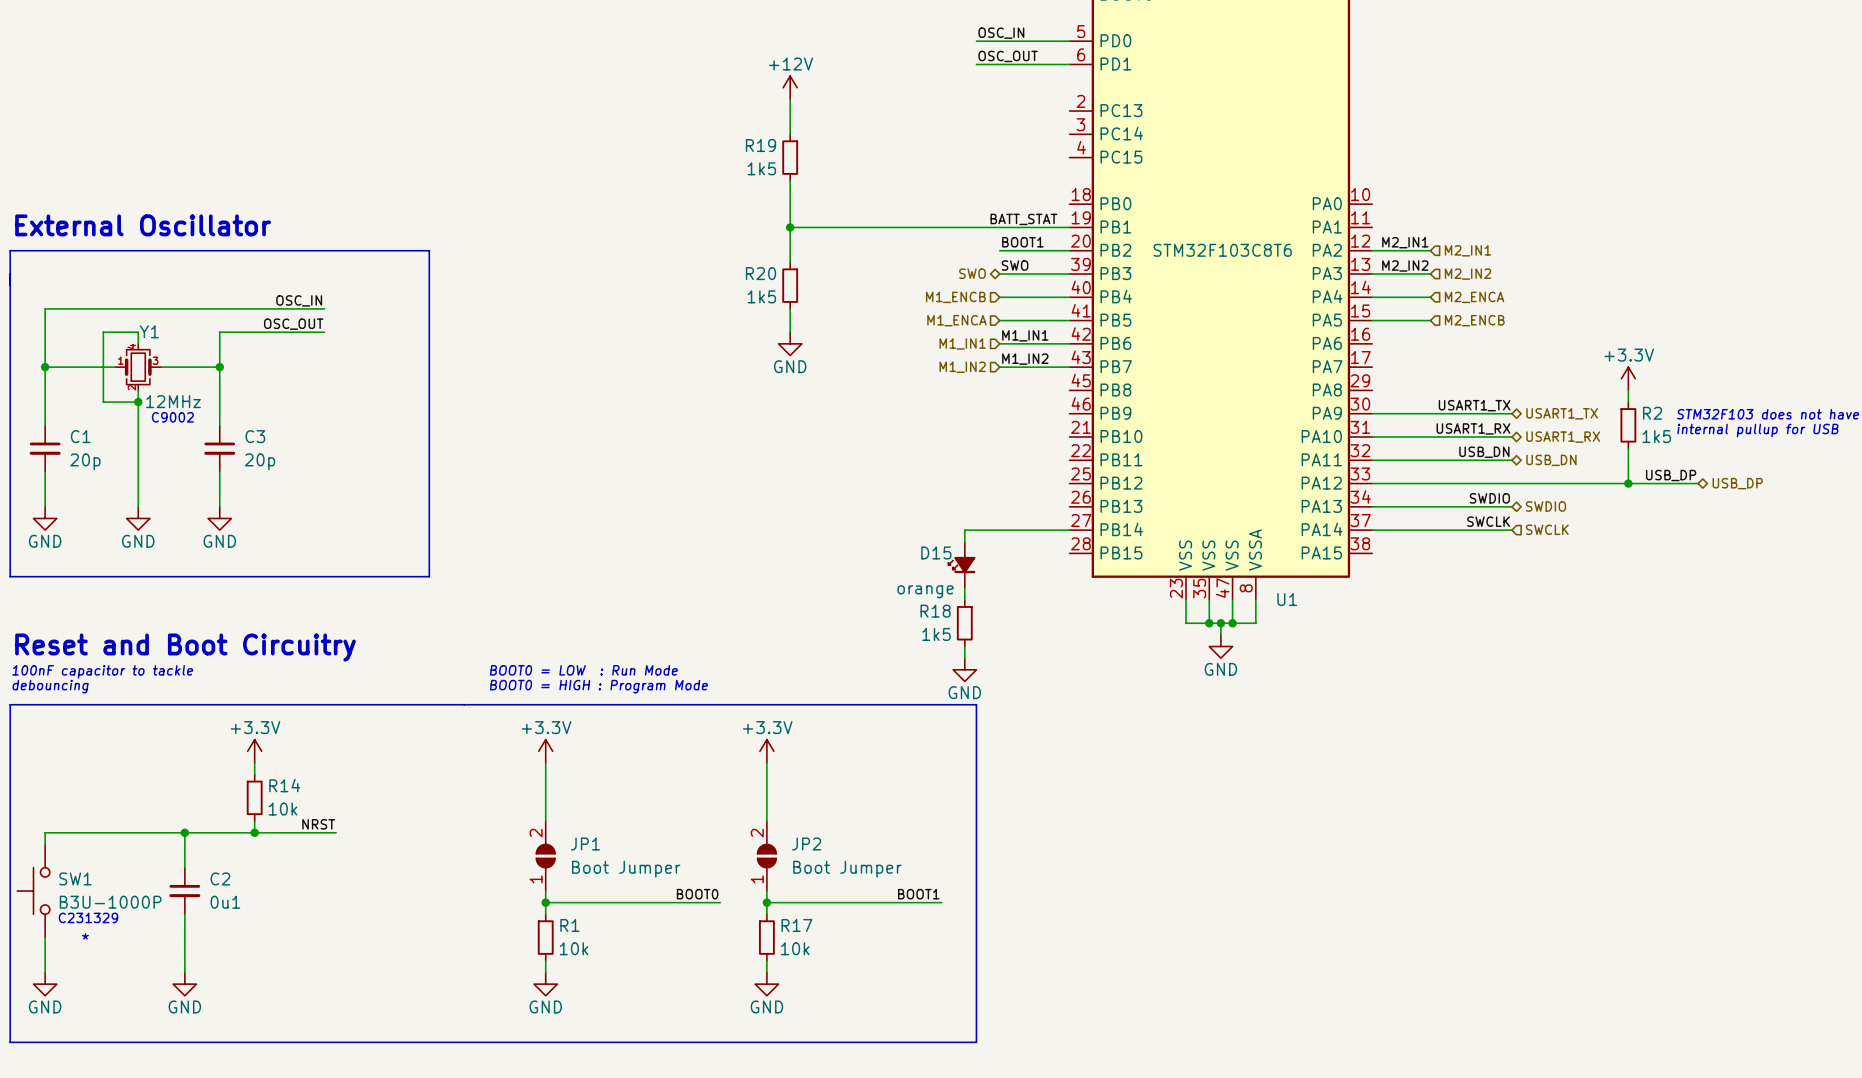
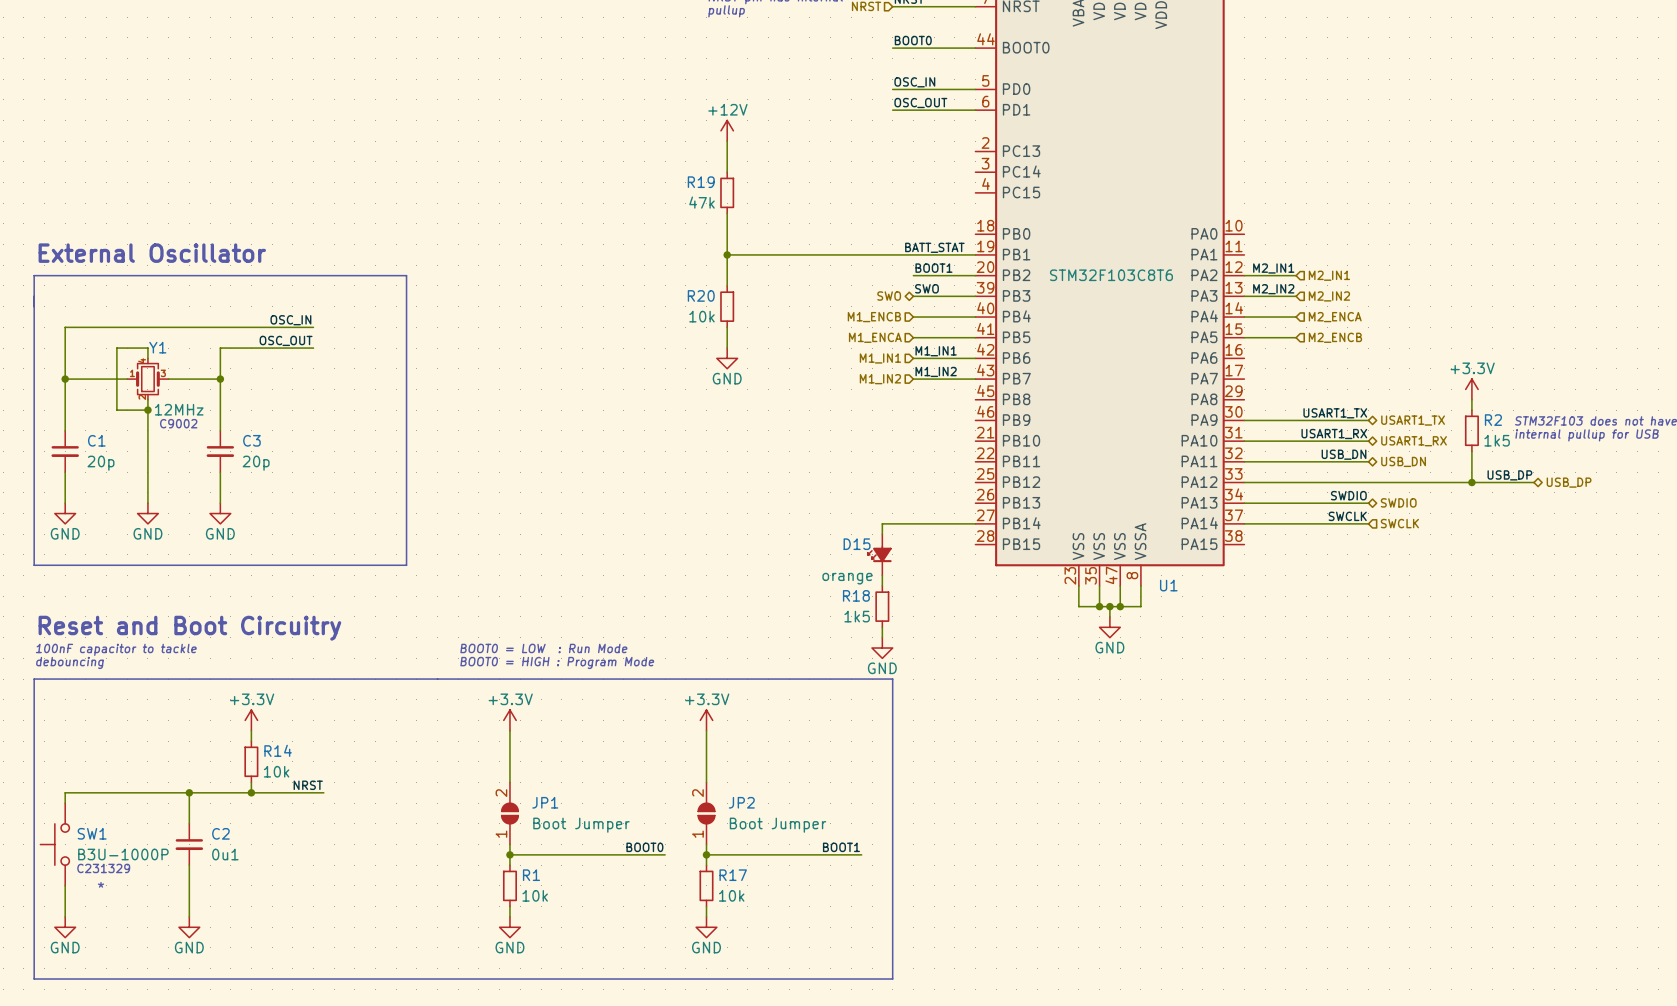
R19 value: 1k5 (761, 168) -> 47k (701, 202)
R20 value: 1k5 (761, 296) -> 10k (701, 316)

